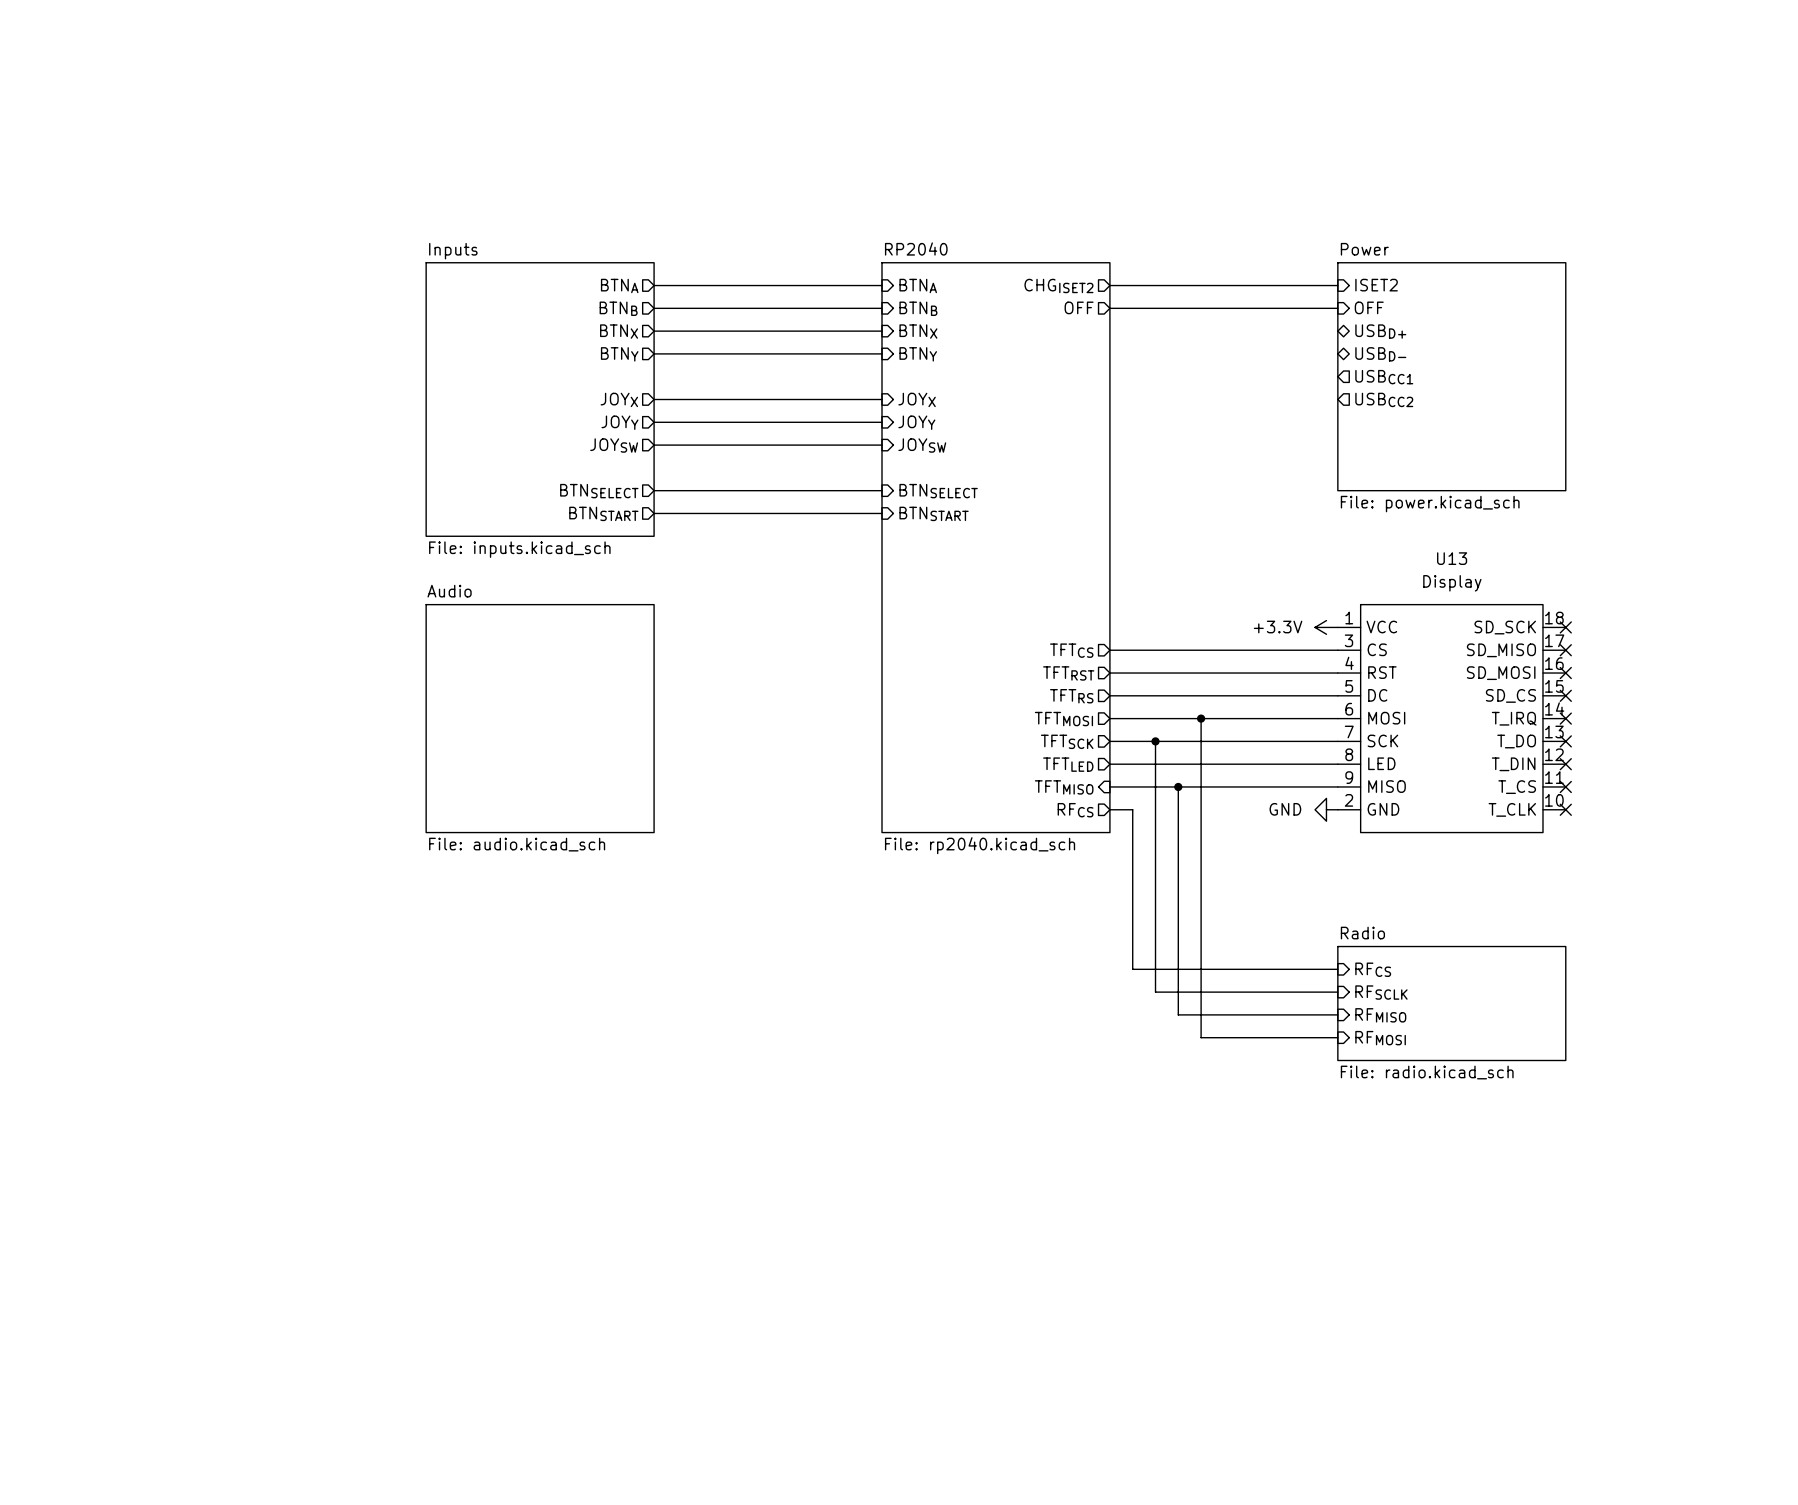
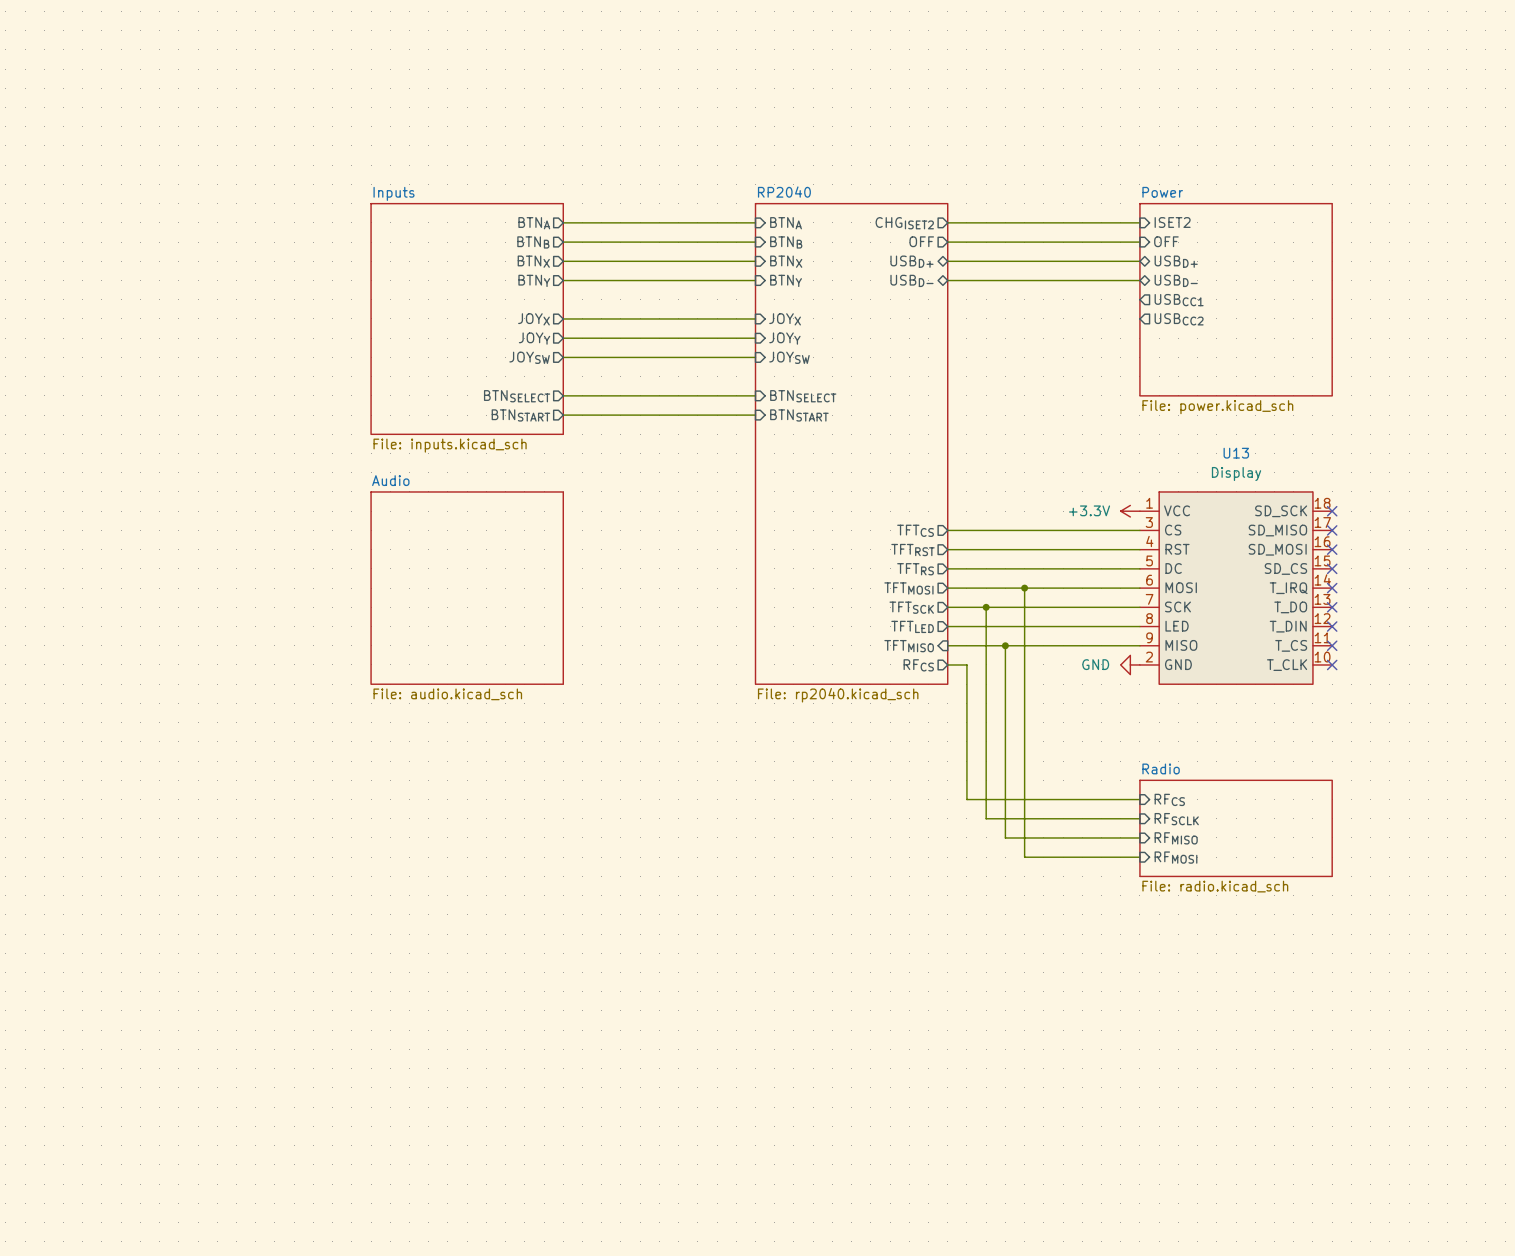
sheet pin: none -> USBD+ (911, 261)
wire: none -> (947, 261) (1139, 261)
wire: none -> (947, 280) (1139, 280)
sheet pin: none -> USBD- (911, 280)

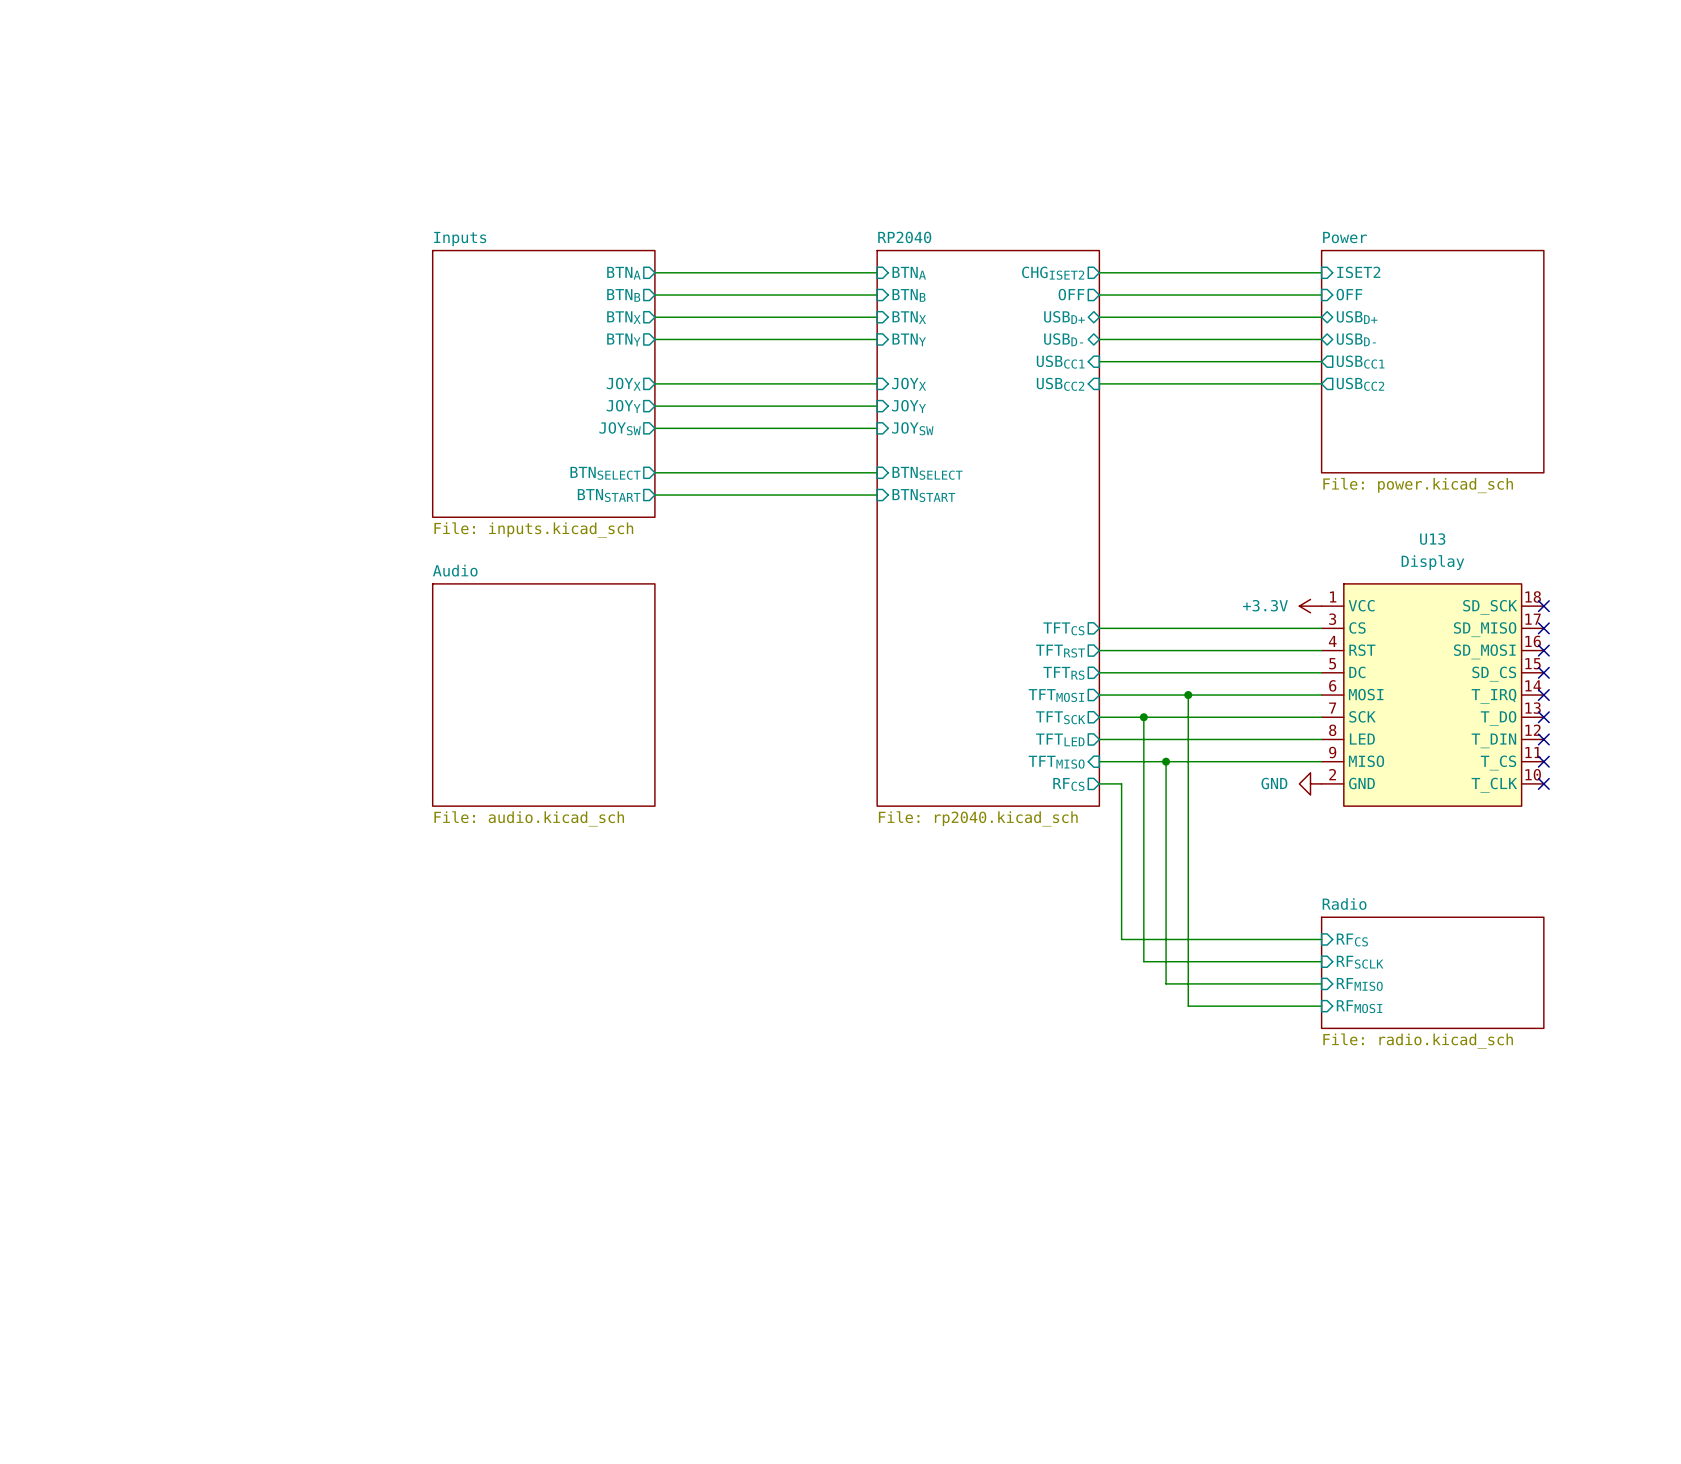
wire: none -> (1099, 361) (1321, 361)
sheet pin: none -> USBCC1 (1060, 362)
wire: none -> (1099, 383) (1321, 383)
sheet pin: none -> USBCC2 (1060, 384)

